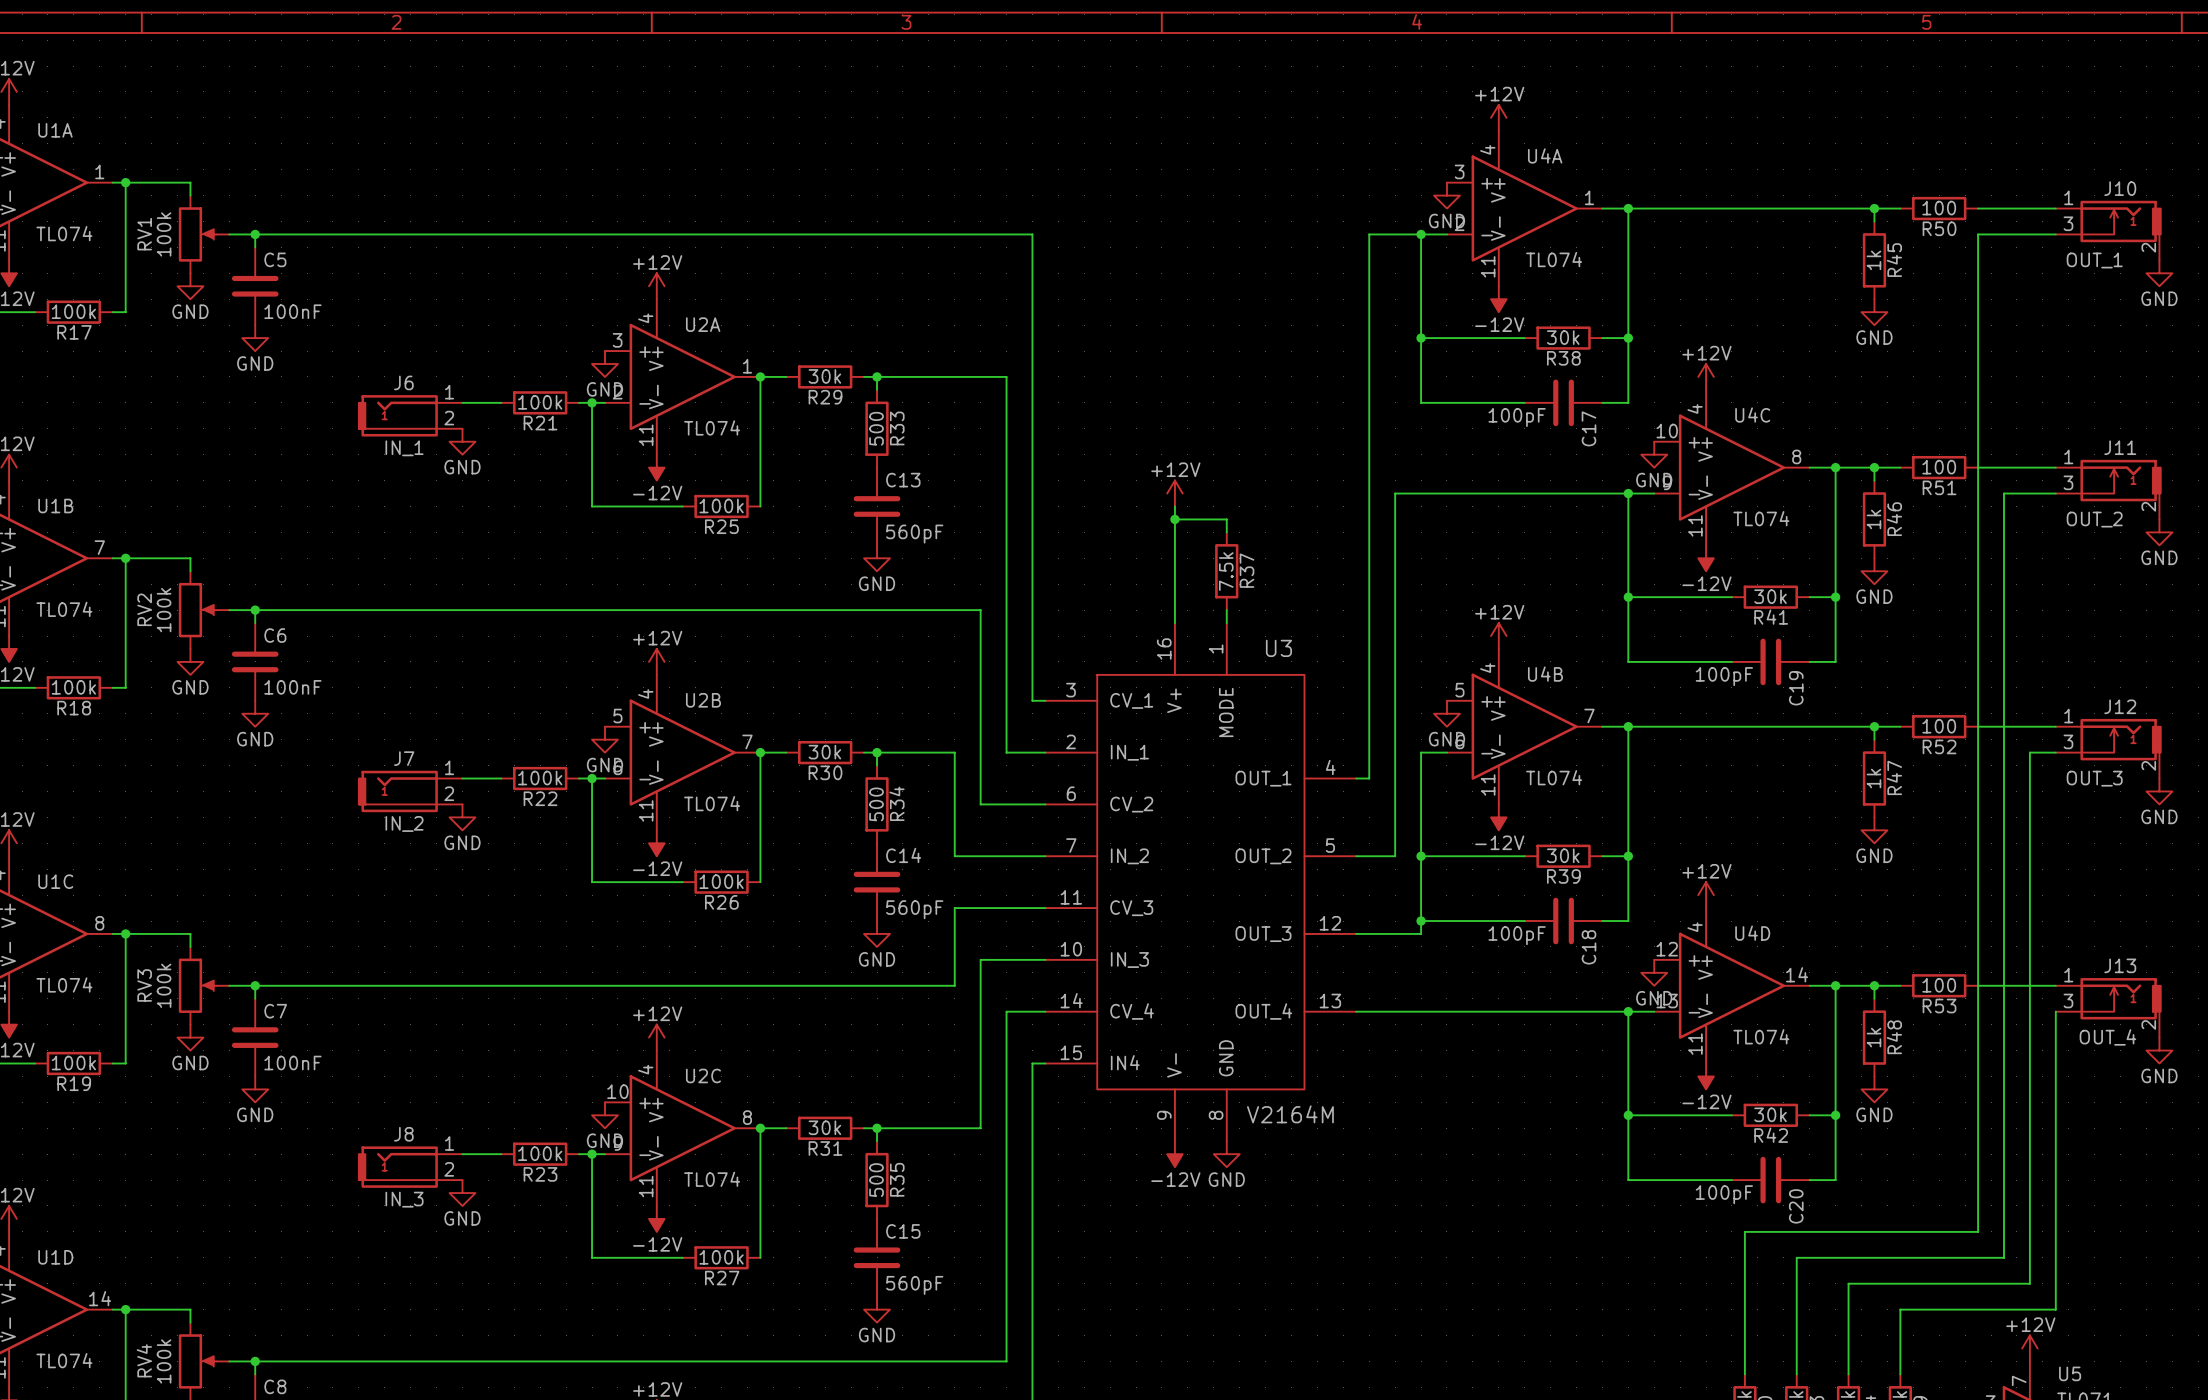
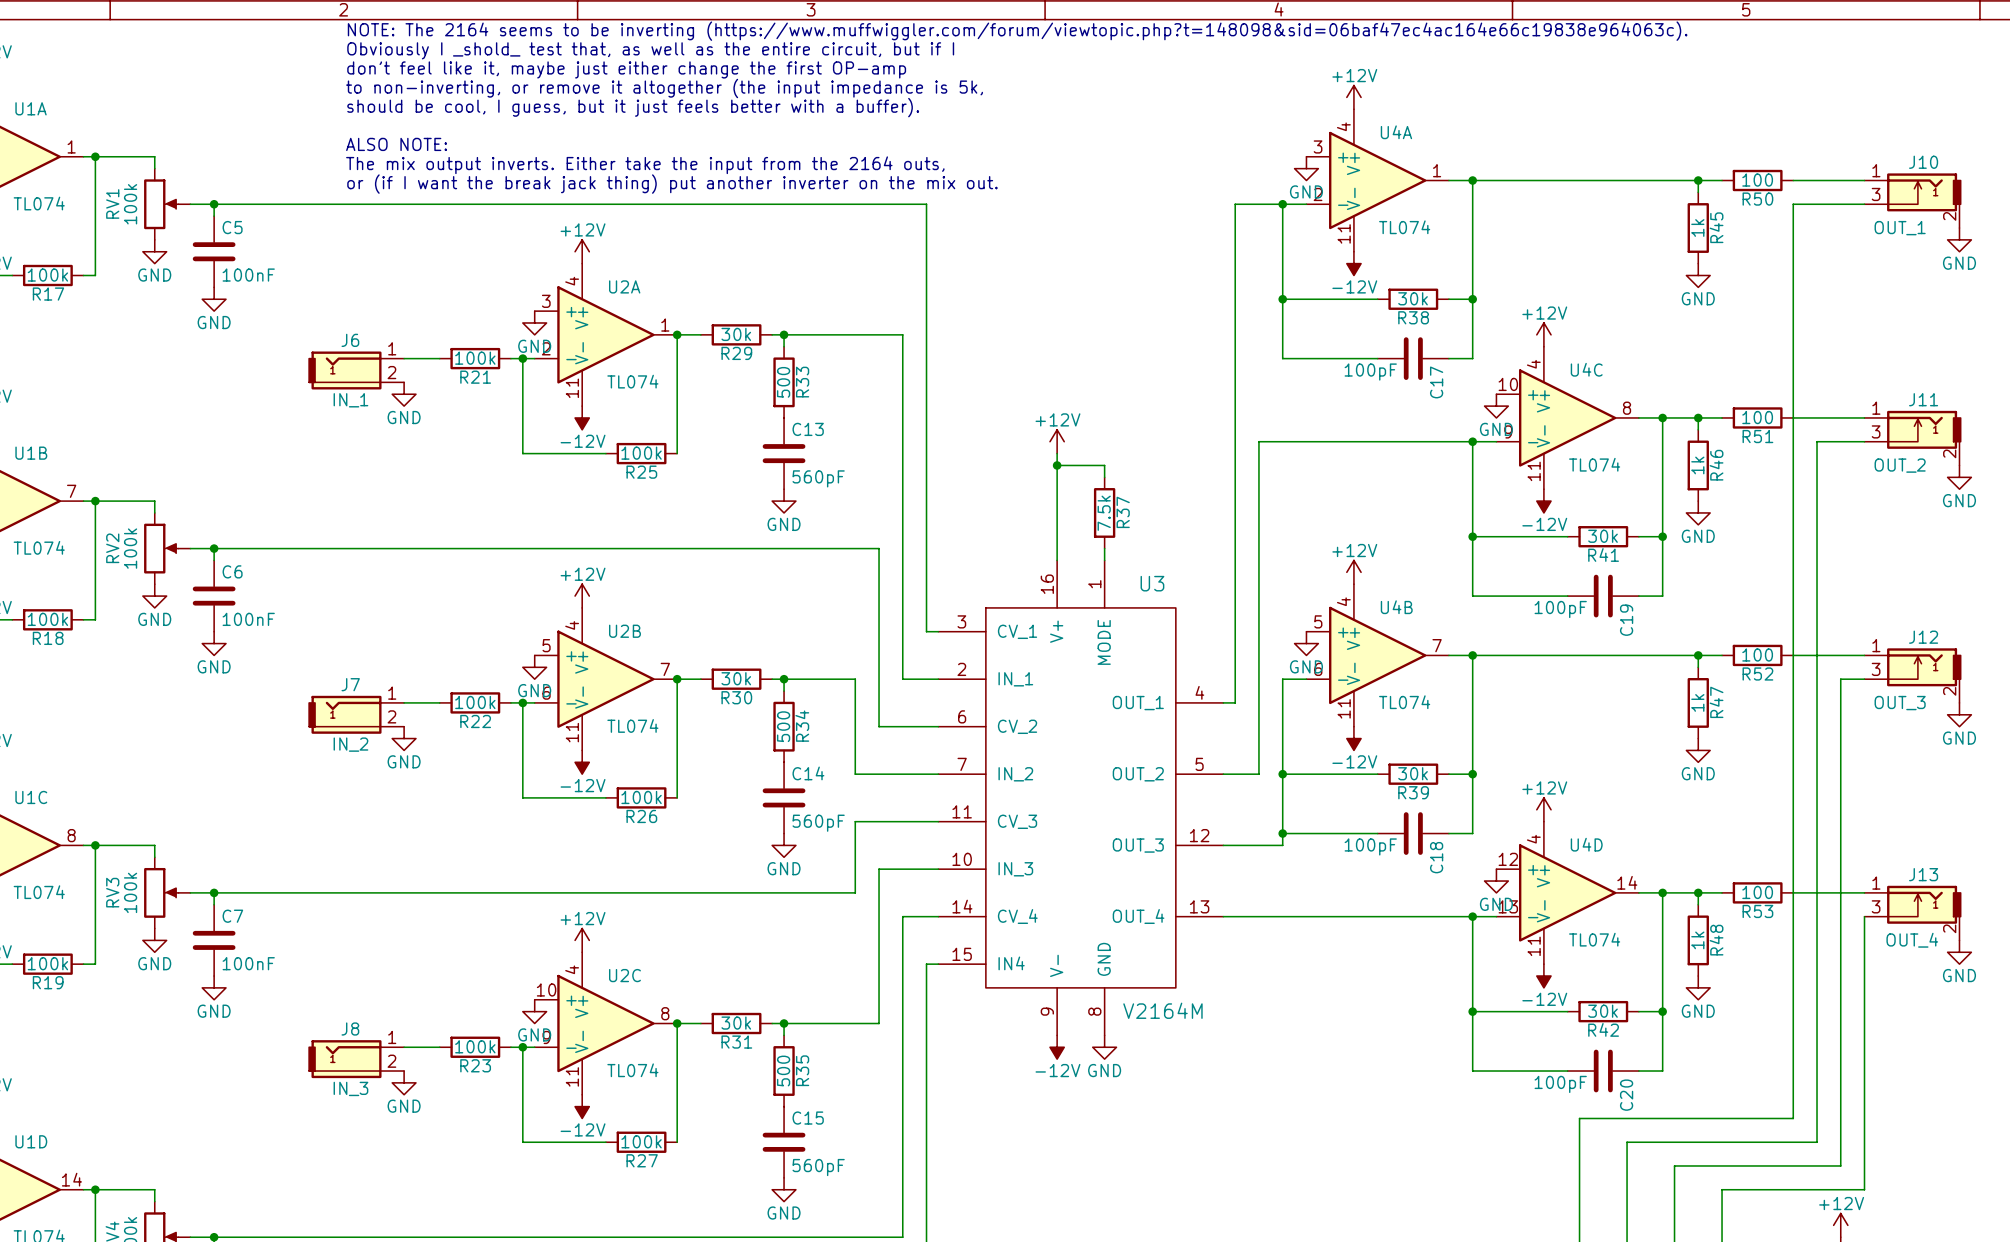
text: none -> NOTE: The 2164 seems to be inverting (https://www.muffwiggler.com/forum/viewtopic.php?t=148098&sid=06baf47ec4ac164e66c19838e964063c). (1017, 31)
text: none -> Obviously I _shold_ test that, as well as the entire circuit, but if I (650, 50)
text: none -> don’t feel like it, maybe just either change the first OP-amp (626, 69)
text: none -> to non-inverting, or remove it altogether (the input impedance is 5k, (664, 88)
text: none -> should be cool, I guess, but it just feels better with a buffer). (633, 107)
text: none -> ALSO NOTE: (396, 144)
text: none -> The mix output inverts. Either take the input from the 2164 outs, (645, 165)
text: none -> or (if I want the break jack thing) put another inverter on the mix out. (672, 184)

